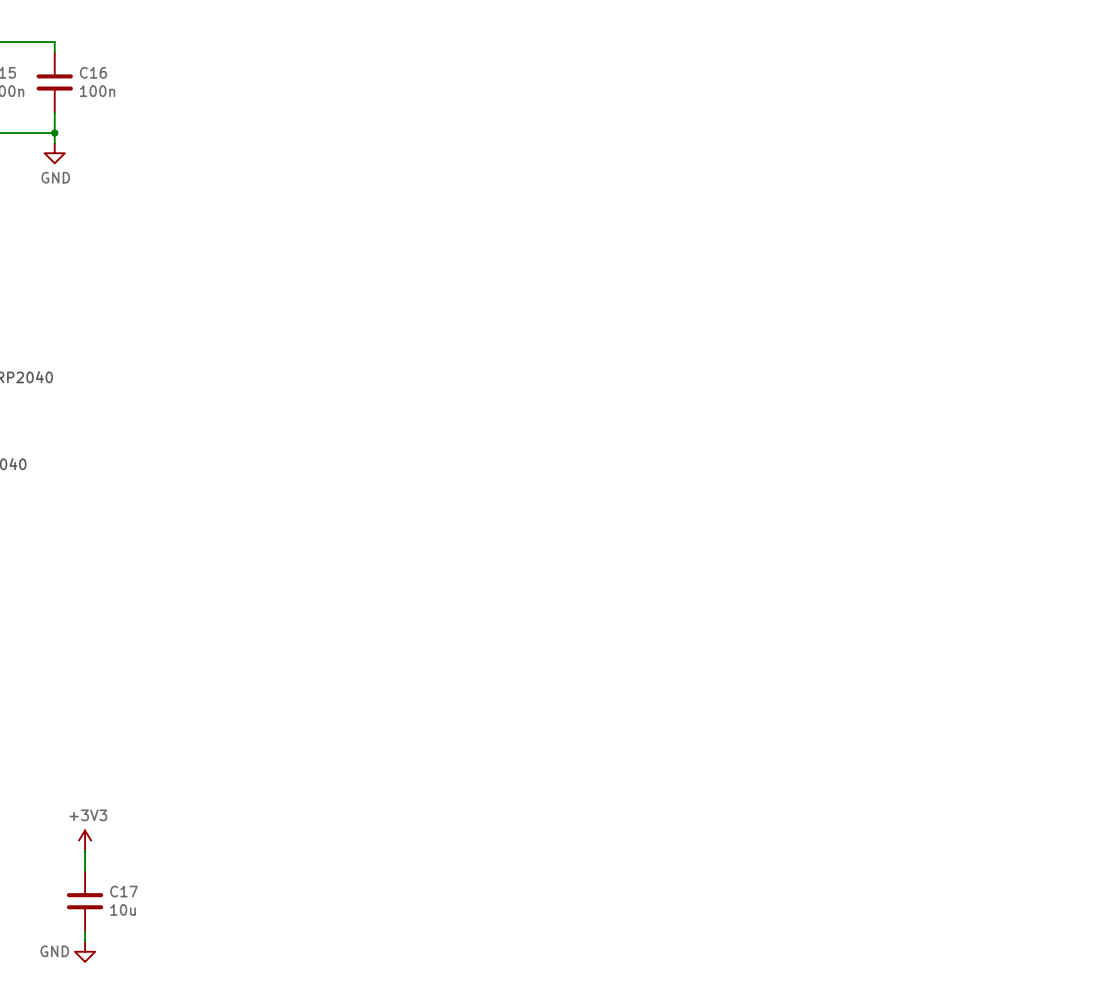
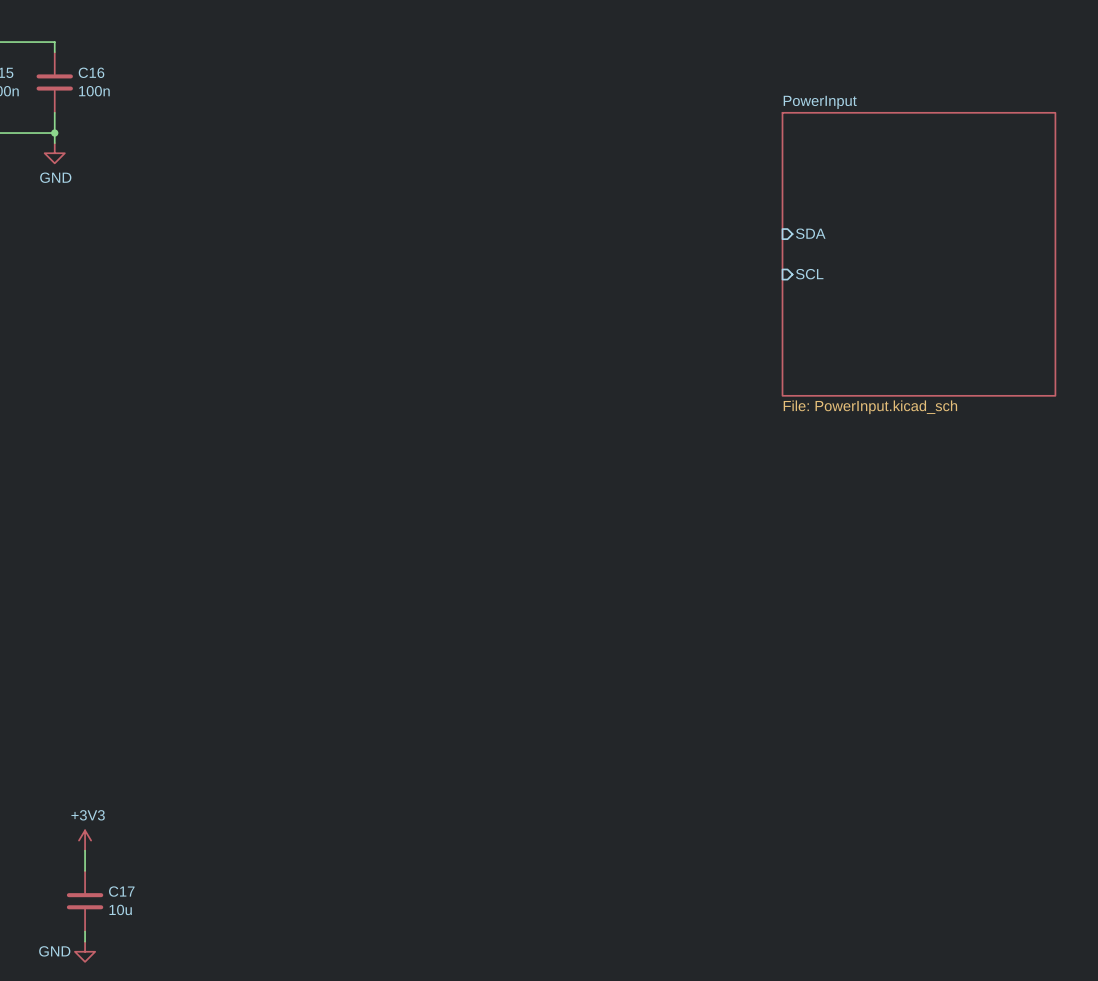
sheet pin: none -> SDA (810, 233)
sheet PowerInput: none -> File: PowerInput.kicad_sch (918, 254)
sheet pin: none -> SCL (809, 274)

